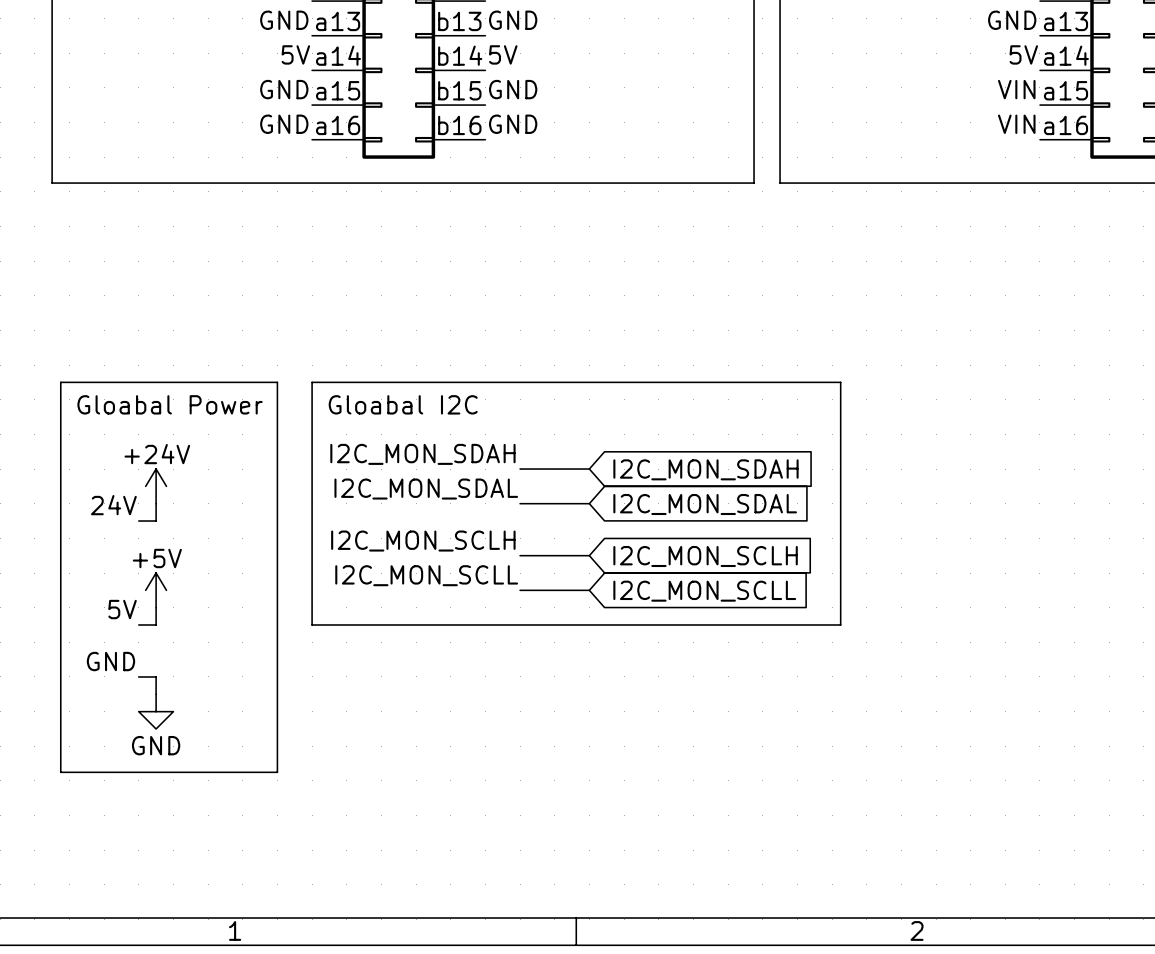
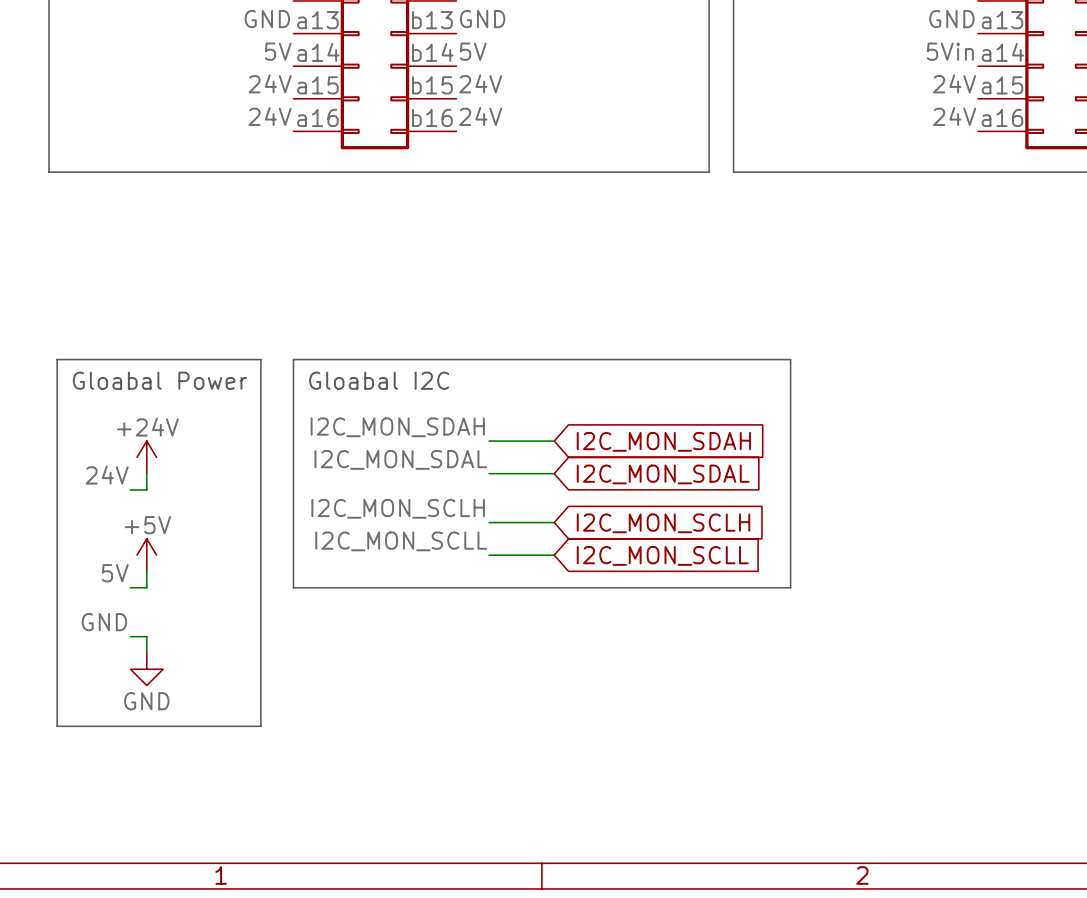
label: 5V (1023, 54) -> 5Vin (950, 51)
label: GND (284, 89) -> 24V (270, 83)
label: GND (513, 89) -> 24V (480, 83)
label: VIN (1016, 89) -> 24V (954, 83)
label: GND (284, 124) -> 24V (270, 116)
label: GND (513, 124) -> 24V (480, 116)
label: VIN (1016, 124) -> 24V (954, 116)

